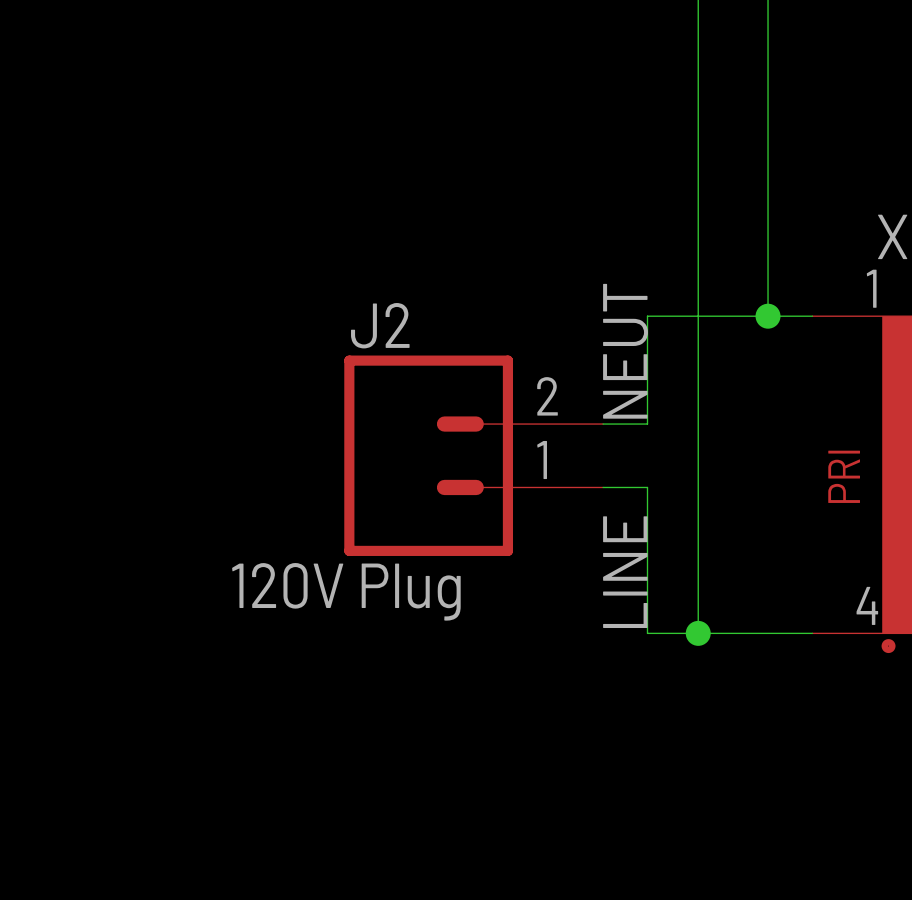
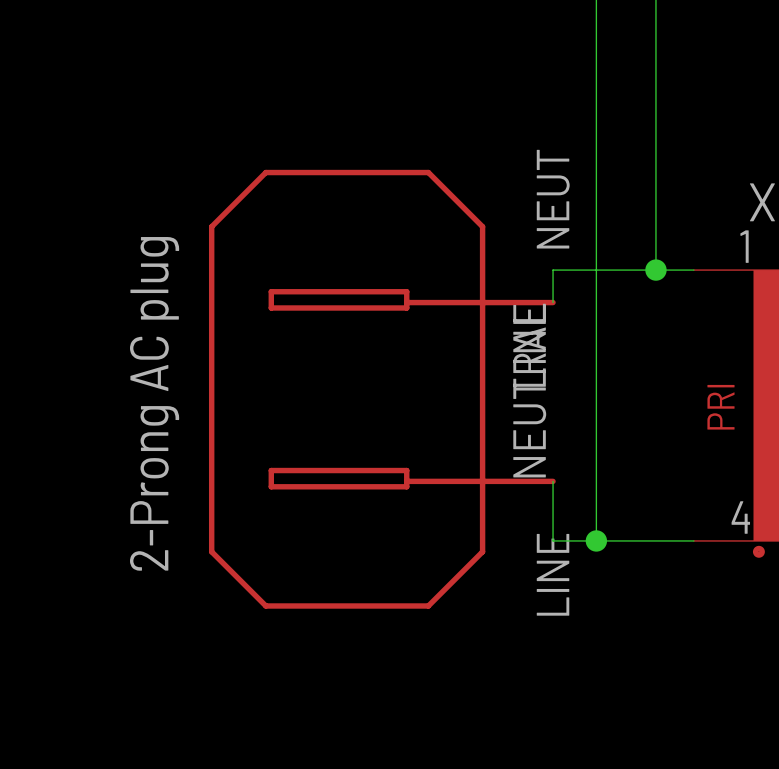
label: NEUT (625, 351) -> none
wire: (647, 354) (647, 424) (603, 424) -> none
part: none -> (382, 389)
J2: 120V Plug (473, 455) -> none
text: none -> 2-Prong AC plug (154, 403)
wire: (603, 487) (647, 487) (647, 563) -> none
label: LINE (625, 572) -> none

